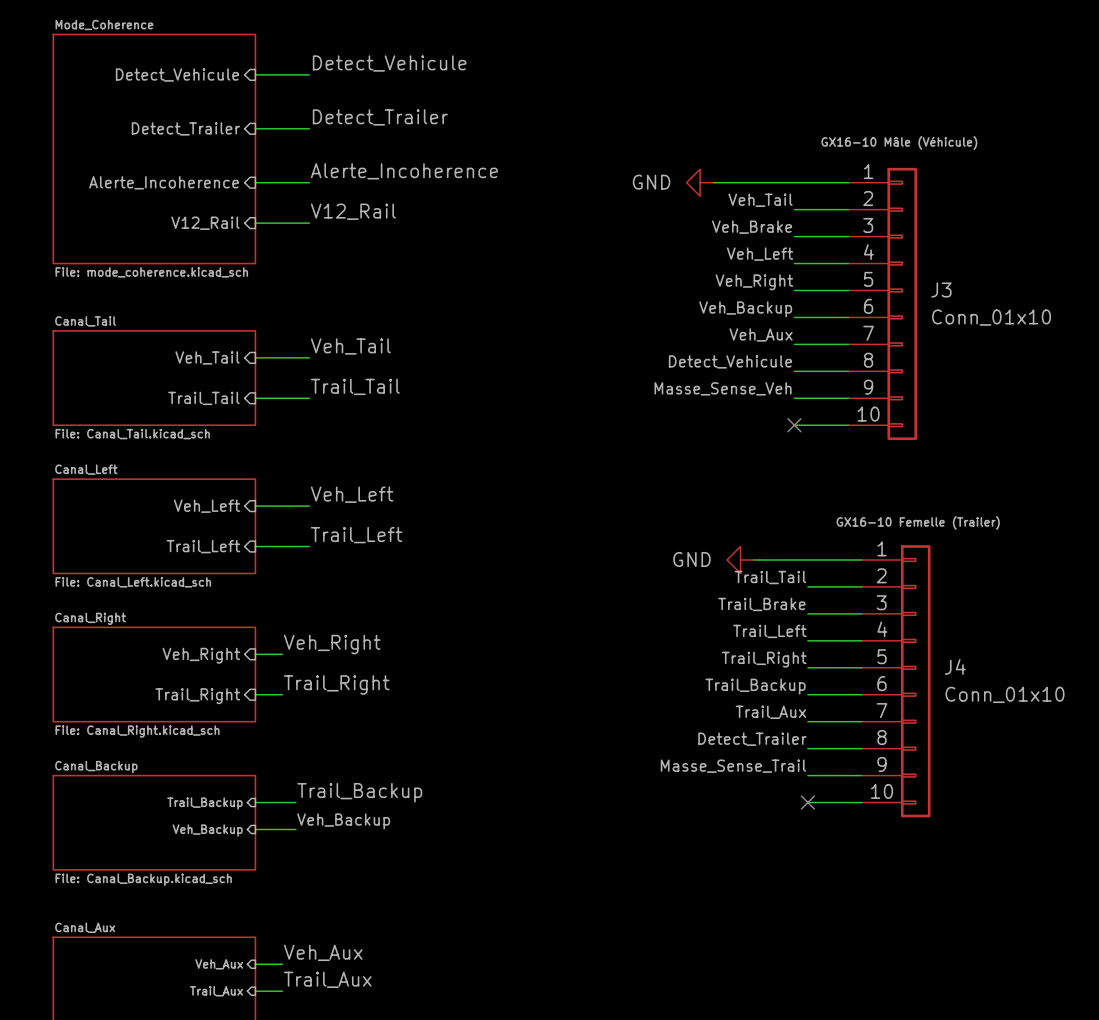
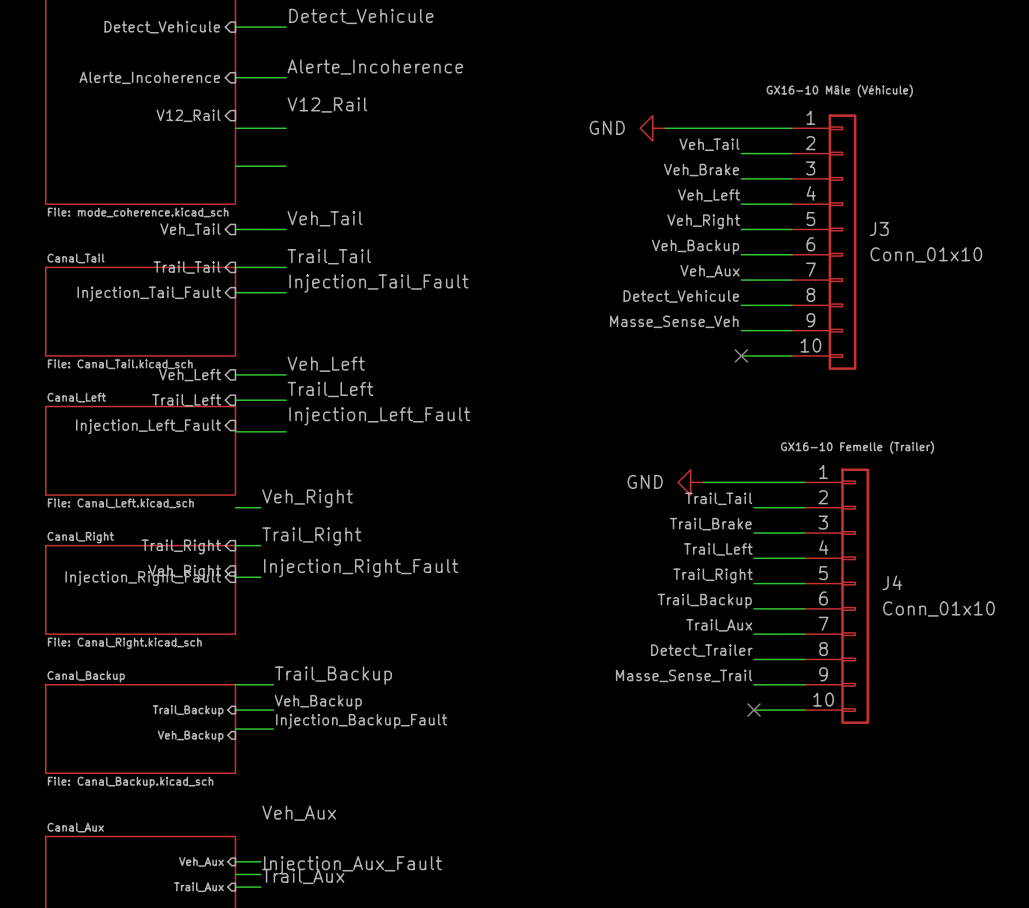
label: Detect_Trailer (380, 117) -> Alerte_Incoherence (375, 67)
sheet pin: Detect_Trailer (185, 128) -> Alerte_Incoherence (149, 77)
label: Alerte_Incoherence (404, 171) -> none
sheet pin: Alerte_Incoherence (164, 182) -> none
label position: V12_Rail (353, 211) -> V12_Rail (327, 104)
sheet pin position: V12_Rail (205, 223) -> V12_Rail (188, 115)
label: none -> Veh_Tail (324, 218)
sheet pin: none -> Veh_Tail (190, 229)
wire: none -> (235, 229) (286, 229)
label: Veh_Tail (350, 346) -> Injection_Tail_Fault (378, 283)
sheet pin: Veh_Tail (207, 357) -> Injection_Tail_Fault (149, 294)
label position: Trail_Tail (355, 386) -> Trail_Tail (329, 256)
sheet pin position: Trail_Tail (203, 398) -> Trail_Tail (187, 267)
wire: (255, 398) (309, 398) -> (235, 267) (286, 267)
wire: none -> (235, 374) (286, 374)
label: none -> Injection_Left_Fault (379, 416)
label position: Veh_Left (352, 494) -> Veh_Left (326, 364)
sheet pin: none -> Injection_Left_Fault (148, 426)
sheet pin position: Veh_Left (206, 506) -> Veh_Left (189, 375)
label position: Trail_Left (356, 535) -> Trail_Left (330, 389)
sheet pin position: Trail_Left (203, 546) -> Trail_Left (186, 400)
wire: (255, 546) (309, 546) -> (235, 400) (286, 400)
label position: Veh_Right (332, 644) -> Veh_Right (307, 498)
label: none -> Injection_Right_Fault (361, 568)
wire: (255, 654) (282, 654) -> (235, 507) (260, 507)
wire: none -> (235, 577) (260, 577)
sheet pin: none -> Injection_Right_Fault (143, 578)
label position: Trail_Right (336, 684) -> Trail_Right (311, 536)
wire: (255, 694) (282, 694) -> (235, 545) (260, 545)
sheet pin position: Trail_Right (197, 696) -> Trail_Right (181, 546)
label: none -> Trail_Backup (333, 675)
label: Trail_Backup (359, 792) -> Veh_Backup (318, 702)
label: Veh_Backup (343, 821) -> Injection_Backup_Fault (361, 721)
wire: none -> (235, 729) (273, 729)
wire: (255, 829) (295, 829) -> (235, 684) (273, 684)
label position: Veh_Aux (323, 952) -> Veh_Aux (299, 813)
label: none -> Injection_Aux_Fault (352, 865)
wire: none -> (235, 874) (260, 874)

